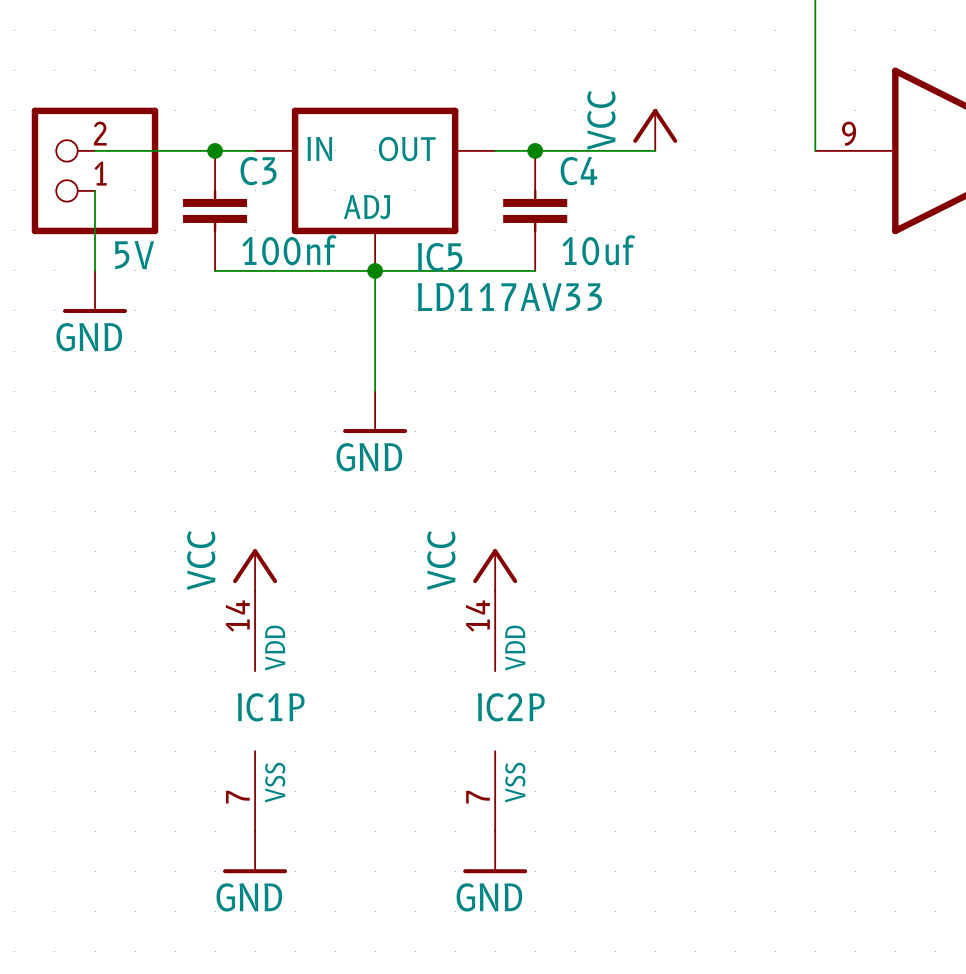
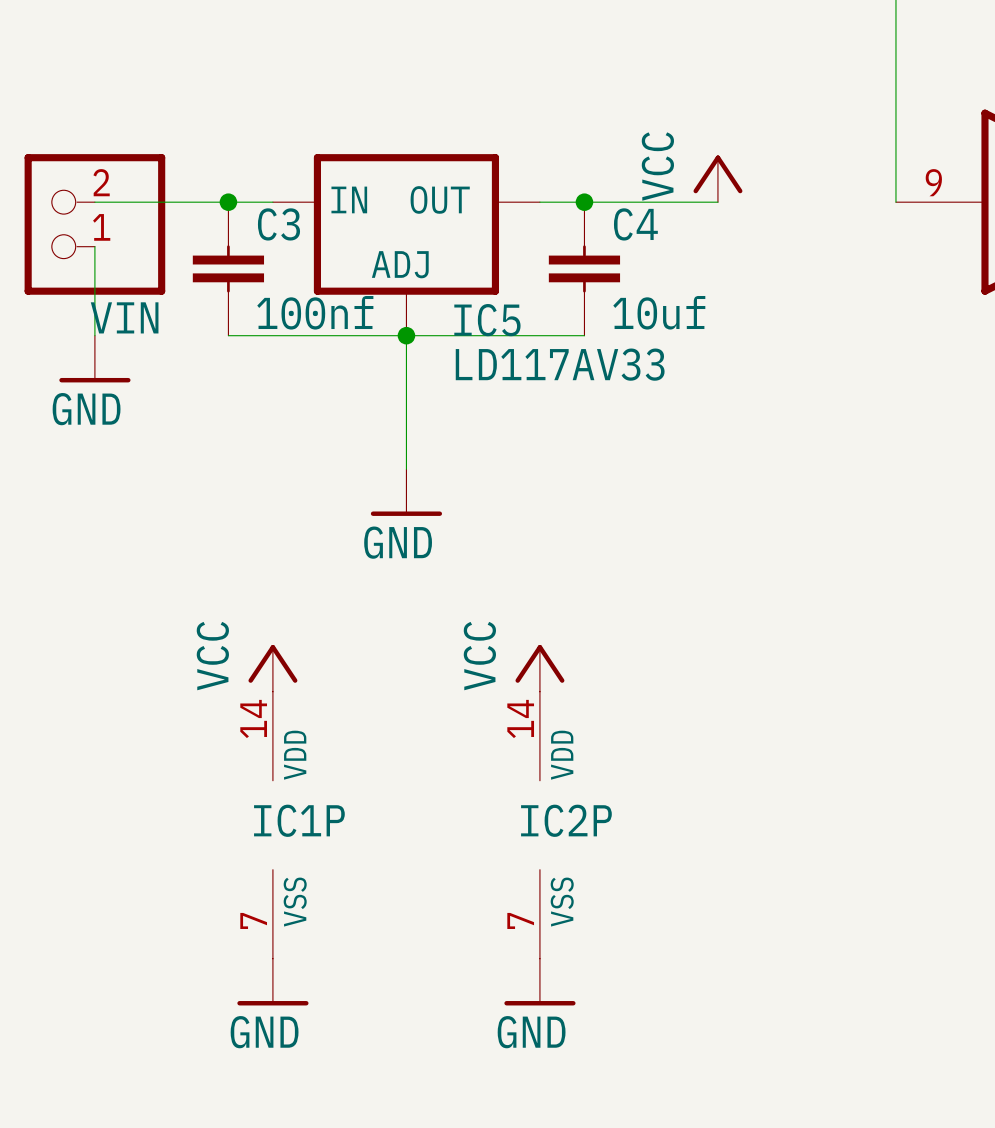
5V name: 5V (134, 255) -> VIN (124, 317)

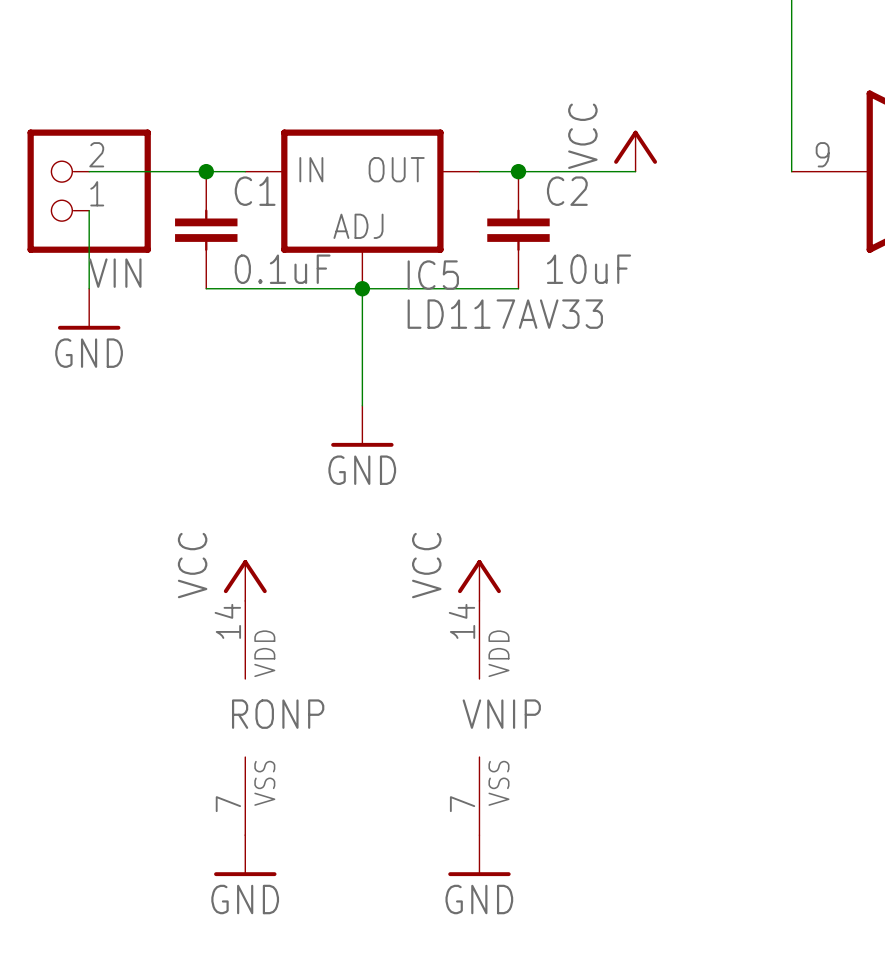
C3 name: C3 (278, 224) -> C1 (255, 191)
C4 name: C4 (635, 224) -> C2 (567, 191)
C3 value: 100nf (315, 312) -> 0.1uF (282, 269)
C4 value: 10uf (659, 312) -> 10uF (589, 269)
IC1P name: IC1P (299, 820) -> RONP (278, 714)
IC2P name: IC2P (566, 820) -> VNIP (501, 714)

